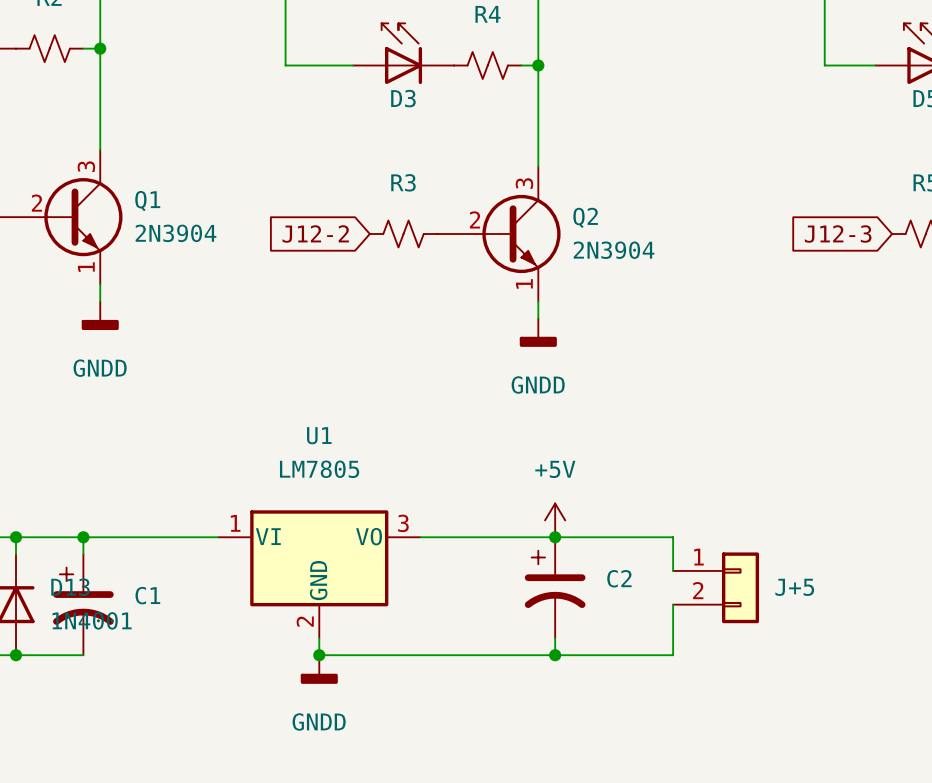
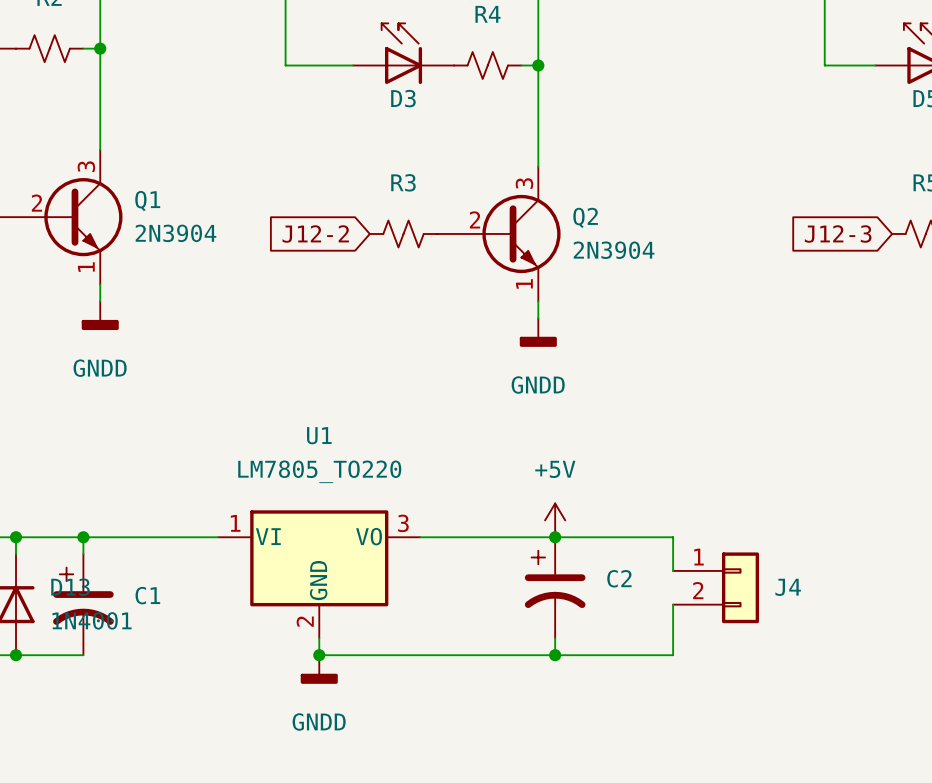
U1 value: LM7805 (319, 469) -> LM7805_TO220 (319, 471)
J+5 name: J+5 (794, 587) -> J4 (788, 587)

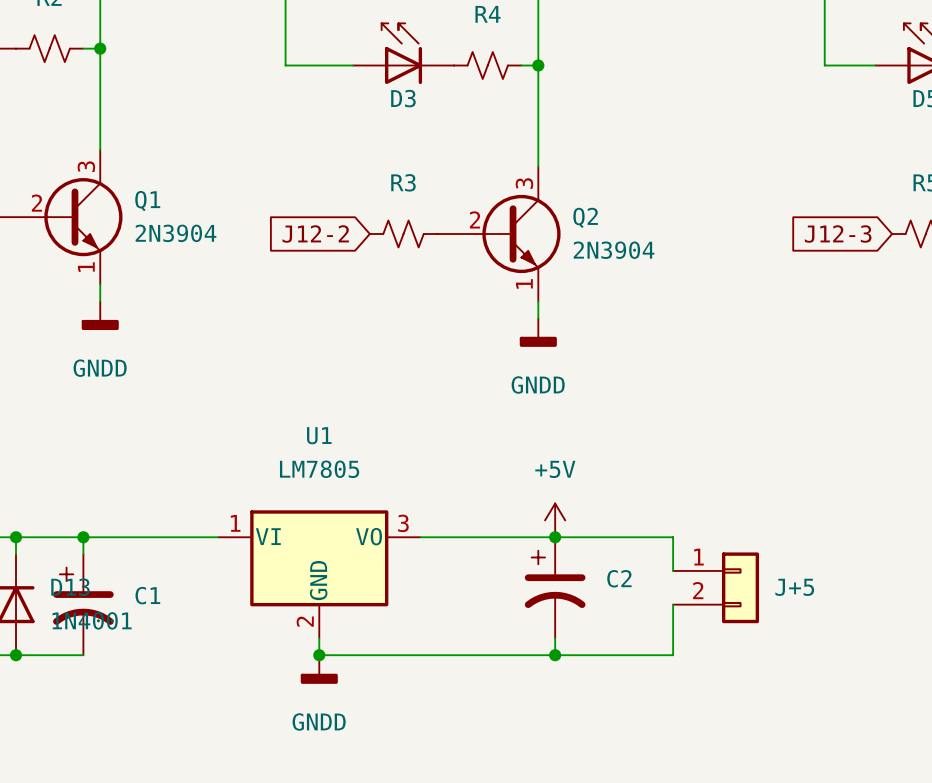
U1 value: LM7805_TO220 (319, 471) -> LM7805 (319, 469)
J4 name: J4 (788, 587) -> J+5 (794, 587)

